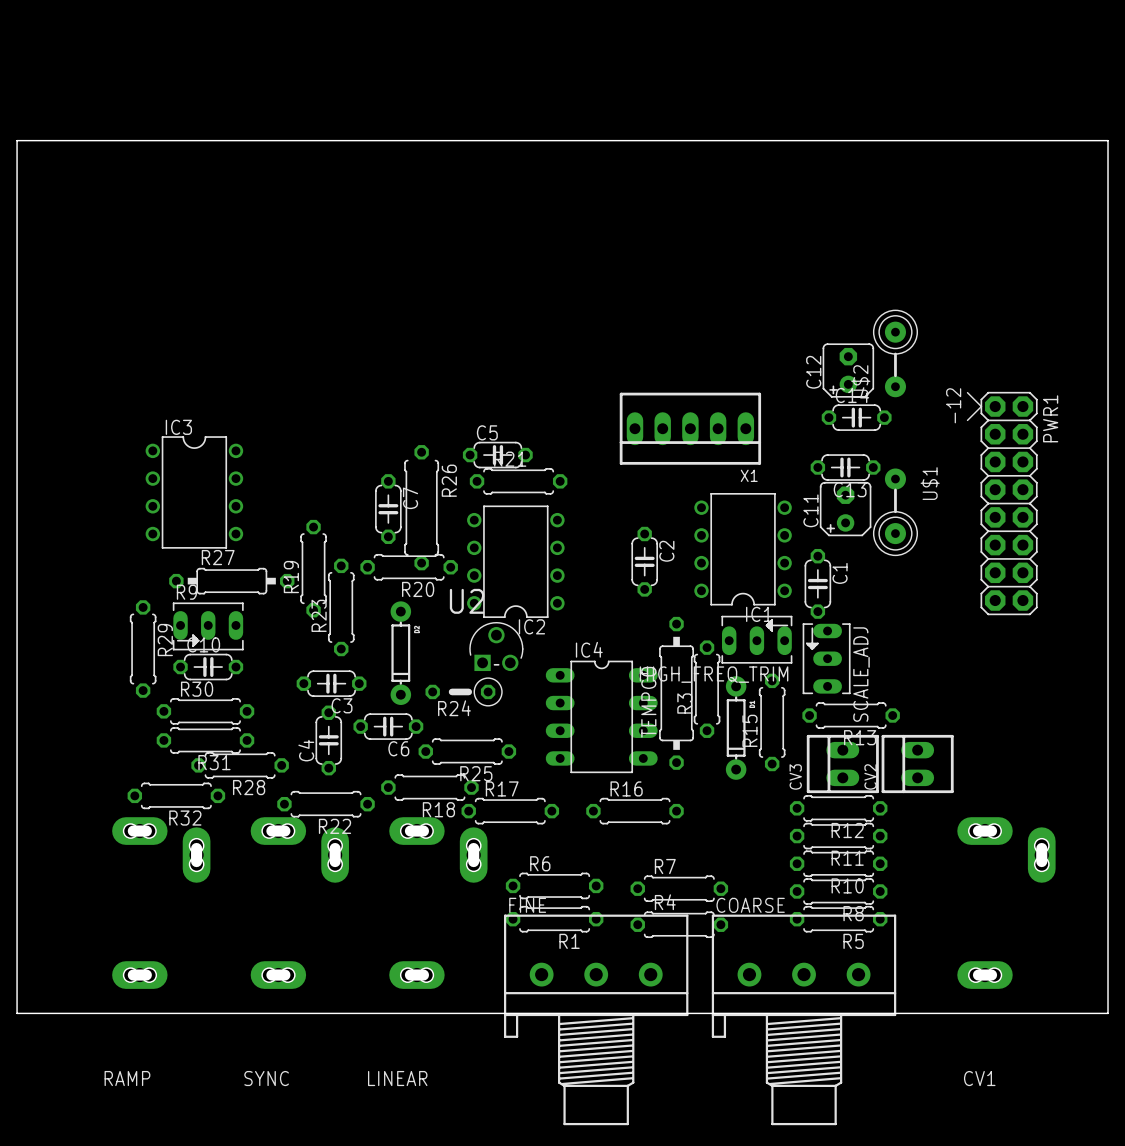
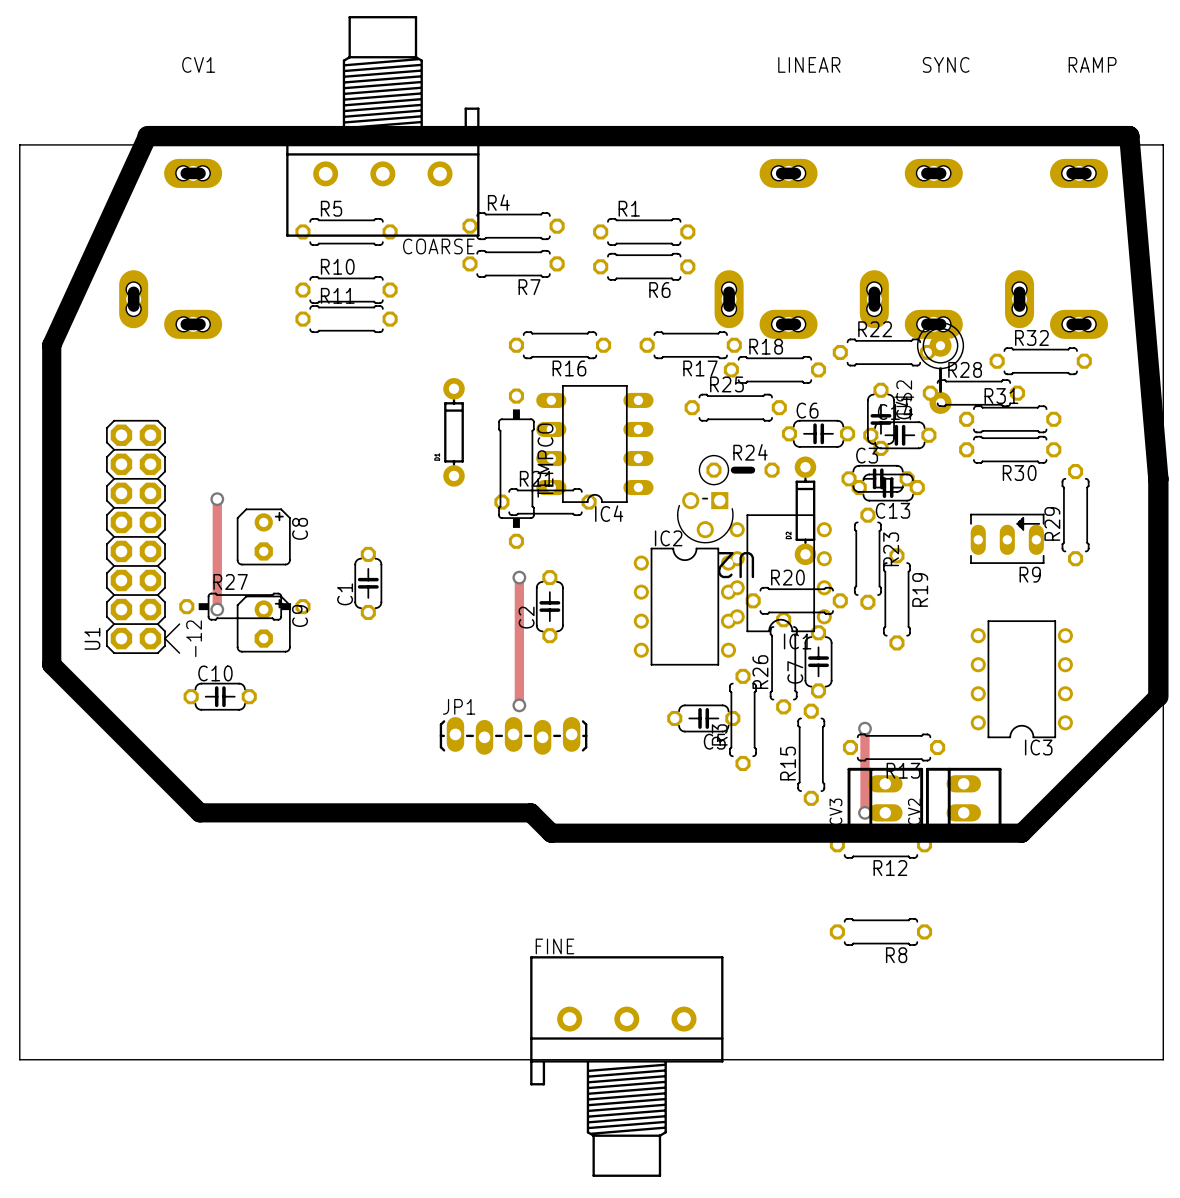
COARSE: none -> (382, 126)
LINEAR: none -> (766, 248)
SYNC: none -> (911, 248)
RAMP: none -> (1056, 248)
C12: (848, 370) -> none
X1: (690, 428) -> none
R26 footprint: [404, 445, 440, 571] -> [769, 612, 798, 715]
TEMPCO: none -> (516, 468)
C5 rotation: 0° (497, 455) -> 180° (703, 718)
C5 position: (497, 455) -> (703, 718)
track: none -> (217, 499) (217, 609)
via: none -> (217, 499)
R26 name position: R26 (449, 480) -> R26 (760, 672)
IC3 rotation: 0° (194, 492) -> 180° (1021, 679)
IC3 position: (194, 492) -> (1021, 679)
PWR1: (1002, 503) -> none
C7 rotation: 0° (388, 509) -> 180° (818, 661)
C7 position: (388, 509) -> (818, 661)
C11: (845, 509) -> none
U$1: (895, 512) -> none
U1: none -> (143, 536)
C8: none -> (263, 536)
track: none -> (519, 577) (519, 705)
via: none -> (519, 577)
IC2 rotation: 0° (515, 561) -> 180° (684, 606)
IC2 position: (515, 561) -> (684, 606)
C2 rotation: 0° (644, 561) -> 180° (549, 606)
C2 position: (644, 561) -> (549, 606)
R20 position: (409, 567) -> (796, 600)
R19 position: (313, 568) -> (896, 599)
R19 name position: R19 (291, 577) -> R19 (920, 589)
via: none -> (217, 609)
C1 rotation: 0° (817, 583) -> 180° (368, 583)
C1 position: (817, 583) -> (368, 583)
R20 name position: R20 (418, 589) -> R20 (787, 577)
C9: none -> (263, 624)
R23 position: (341, 607) -> (867, 558)
R23 name position: R23 (319, 615) -> R23 (891, 549)
R9 rotation: 0° (208, 626) -> 180° (1007, 538)
R9 position: (208, 626) -> (1007, 538)
board edge: none -> (51, 664) (199, 812) (530, 812) (551, 833) (1021, 833) (1158, 696) (1158, 478) (1129, 136) (147, 136) (51, 345) (51, 664)
HIGH_FREQ_TRIM: (756, 639) -> none
R29 name position: R29 (165, 640) -> R29 (1052, 523)
U2 rotation: 0° (496, 646) -> 180° (705, 517)
U2 position: (496, 646) -> (705, 517)
R29 position: (143, 649) -> (1075, 515)
part rotation: 0° (400, 653) -> 180° (805, 510)
part position: (400, 653) -> (805, 510)
SCALE_ADJ: (826, 658) -> none
via: none -> (519, 705)
C3 rotation: 0° (331, 683) -> 180° (878, 478)
C3 position: (331, 683) -> (878, 478)
R30 name position: R30 (197, 689) -> R30 (1019, 473)
R24 rotation: 0° (464, 691) -> 180° (739, 470)
R24 position: (464, 691) -> (739, 470)
TEMPCO: (676, 693) -> none
track: none -> (864, 728) (864, 812)
via: none -> (864, 728)
JP1: none -> (513, 735)
R30 position: (205, 711) -> (1010, 449)
IC4 rotation: 0° (601, 716) -> 180° (594, 443)
IC4 position: (601, 716) -> (594, 443)
C6 rotation: 0° (388, 726) -> 180° (818, 433)
C6 position: (388, 726) -> (818, 433)
part rotation: 0° (736, 727) -> 180° (454, 432)
part position: (736, 727) -> (454, 432)
R31 position: (205, 740) -> (1010, 419)
C4 rotation: 0° (328, 740) -> 180° (880, 419)
C4 position: (328, 740) -> (880, 419)
R25 position: (467, 751) -> (735, 407)
R31 name position: R31 (214, 762) -> R31 (1001, 396)
R28 position: (240, 765) -> (973, 393)
R25 name position: R25 (476, 773) -> R25 (726, 384)
via: none -> (864, 812)
R28 name position: R28 (249, 787) -> R28 (965, 369)
R18 position: (429, 787) -> (774, 369)
R17 name position: R17 (502, 788) -> R17 (700, 368)
R16 name position: R16 (626, 788) -> R16 (569, 368)
R32 position: (176, 795) -> (1040, 361)
R22 position: (326, 804) -> (883, 352)
R18 name position: R18 (438, 809) -> R18 (766, 346)
R17 position: (510, 811) -> (690, 345)
R16 position: (634, 811) -> (560, 345)
R32 name position: R32 (185, 818) -> R32 (1031, 337)
R22 name position: R22 (335, 826) -> R22 (875, 329)
R11 position: (838, 836) -> (346, 319)
R11 name position: R11 (847, 858) -> R11 (337, 295)
R6 name position: R6 (540, 863) -> R6 (659, 290)
R10 position: (838, 863) -> (346, 290)
R7 name position: R7 (665, 866) -> R7 (529, 287)
R6 position: (554, 885) -> (644, 266)
R10 name position: R10 (847, 885) -> R10 (337, 266)
R7 position: (679, 888) -> (513, 263)
RAMP: (161, 903) -> none
SYNC: (299, 903) -> none
LINEAR: (438, 903) -> none
CV1 rotation: 0° (1006, 903) -> 180° (170, 248)
CV1 position: (1006, 903) -> (170, 248)
R1 position: (554, 919) -> (644, 231)
R5 position: (838, 919) -> (346, 231)
R4 position: (679, 924) -> (513, 226)
R1 name position: R1 (569, 941) -> R1 (629, 208)
R5 name position: R5 (853, 941) -> R5 (331, 208)
COARSE: (804, 1019) -> none

